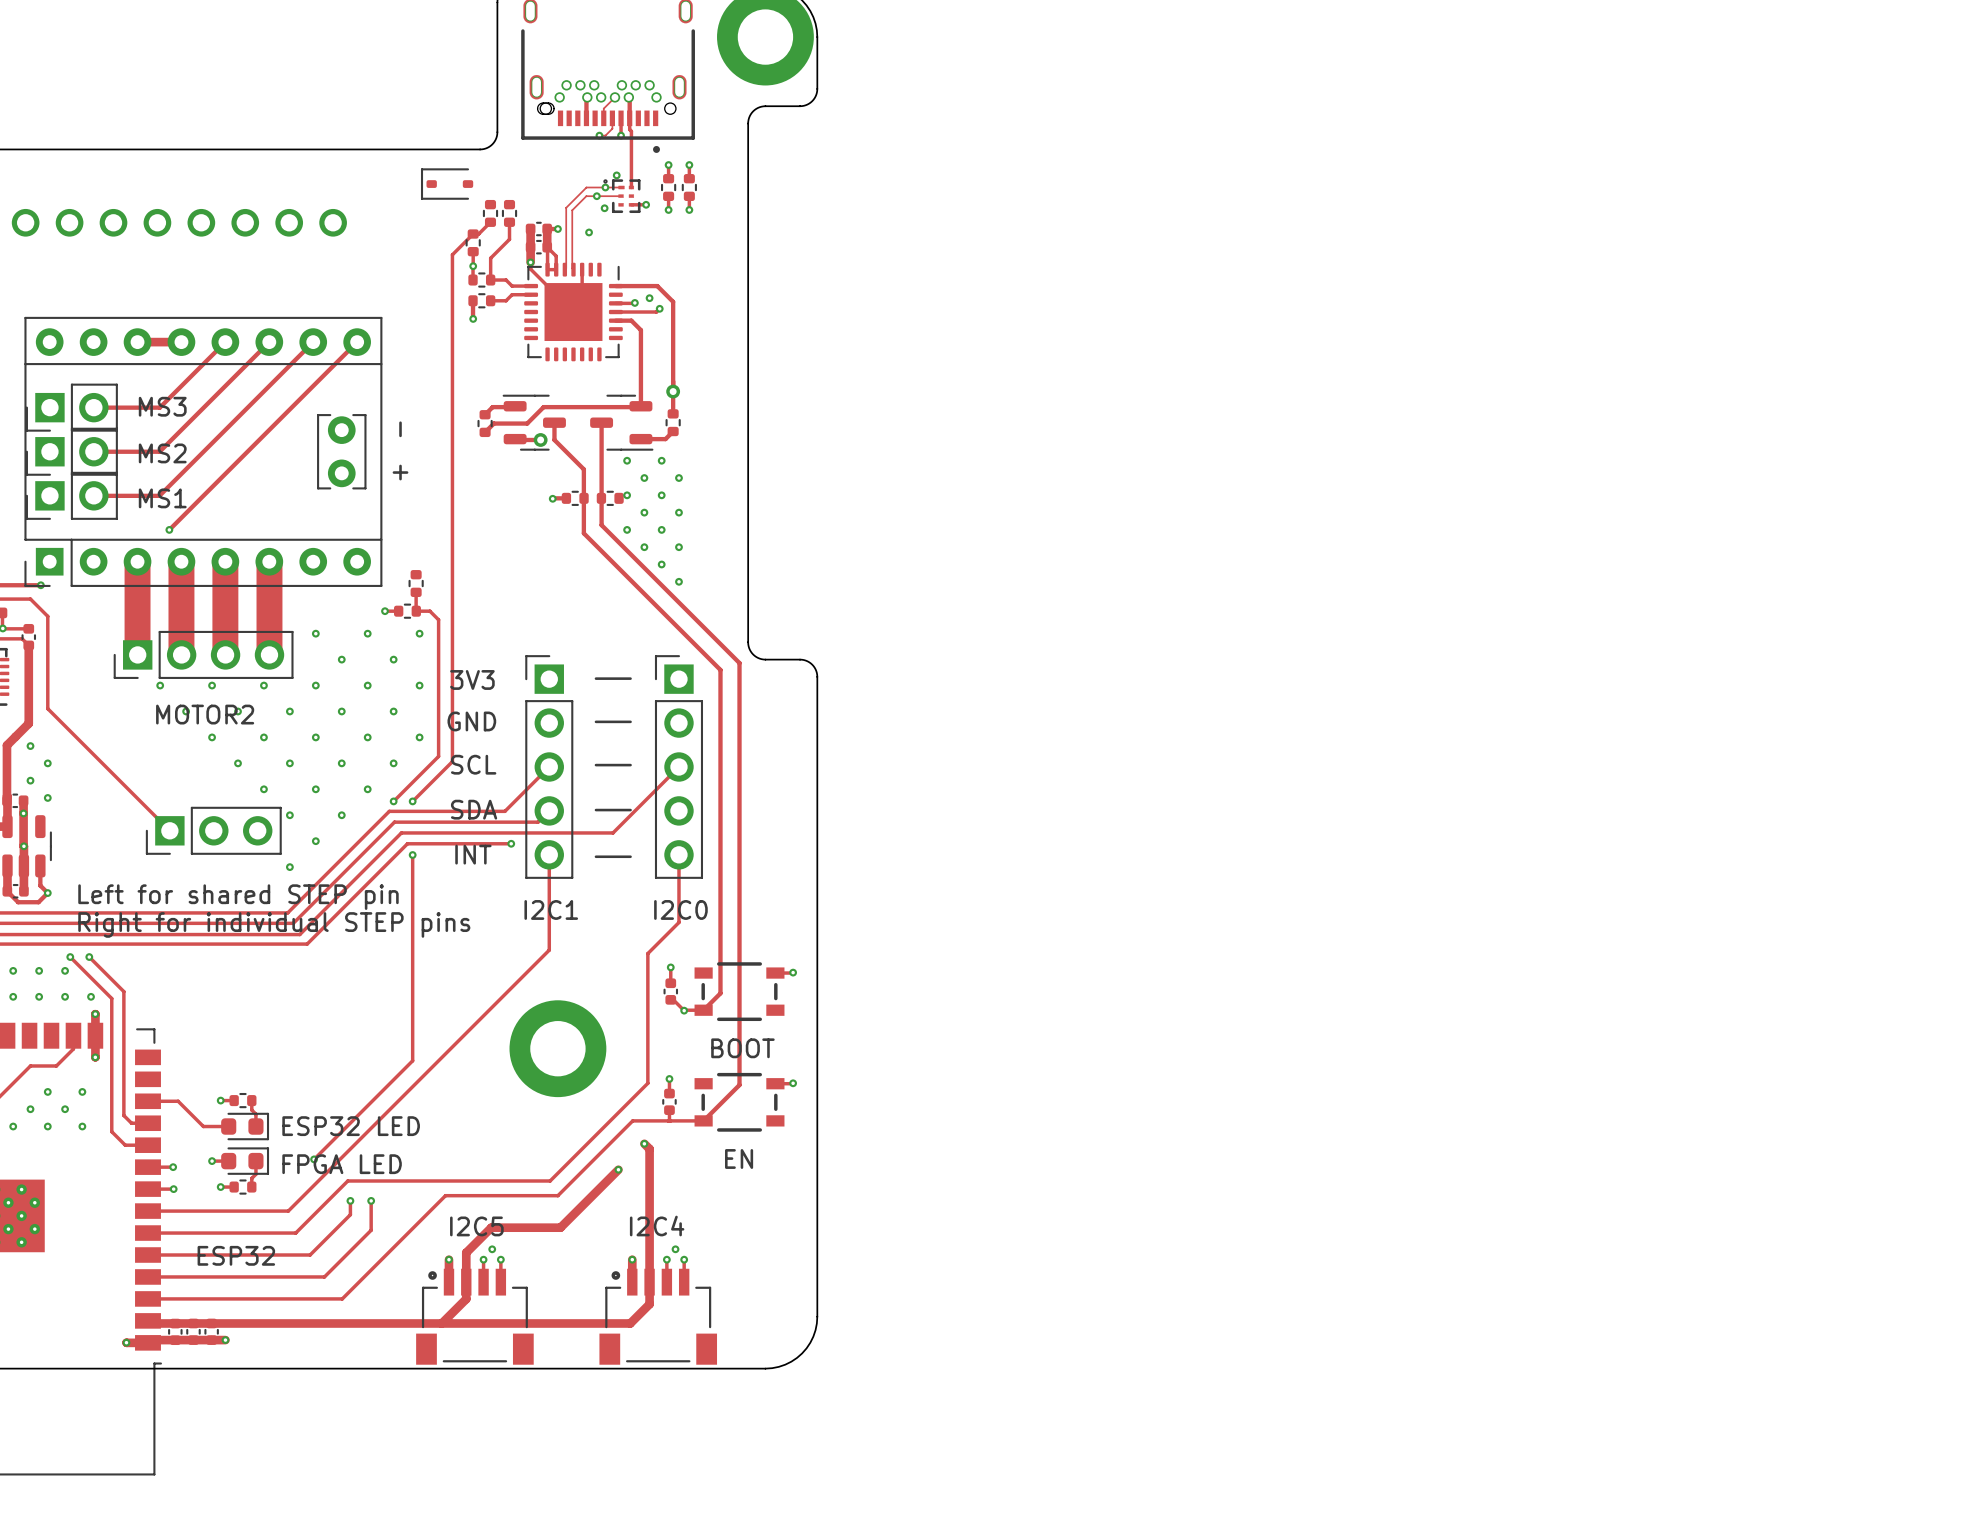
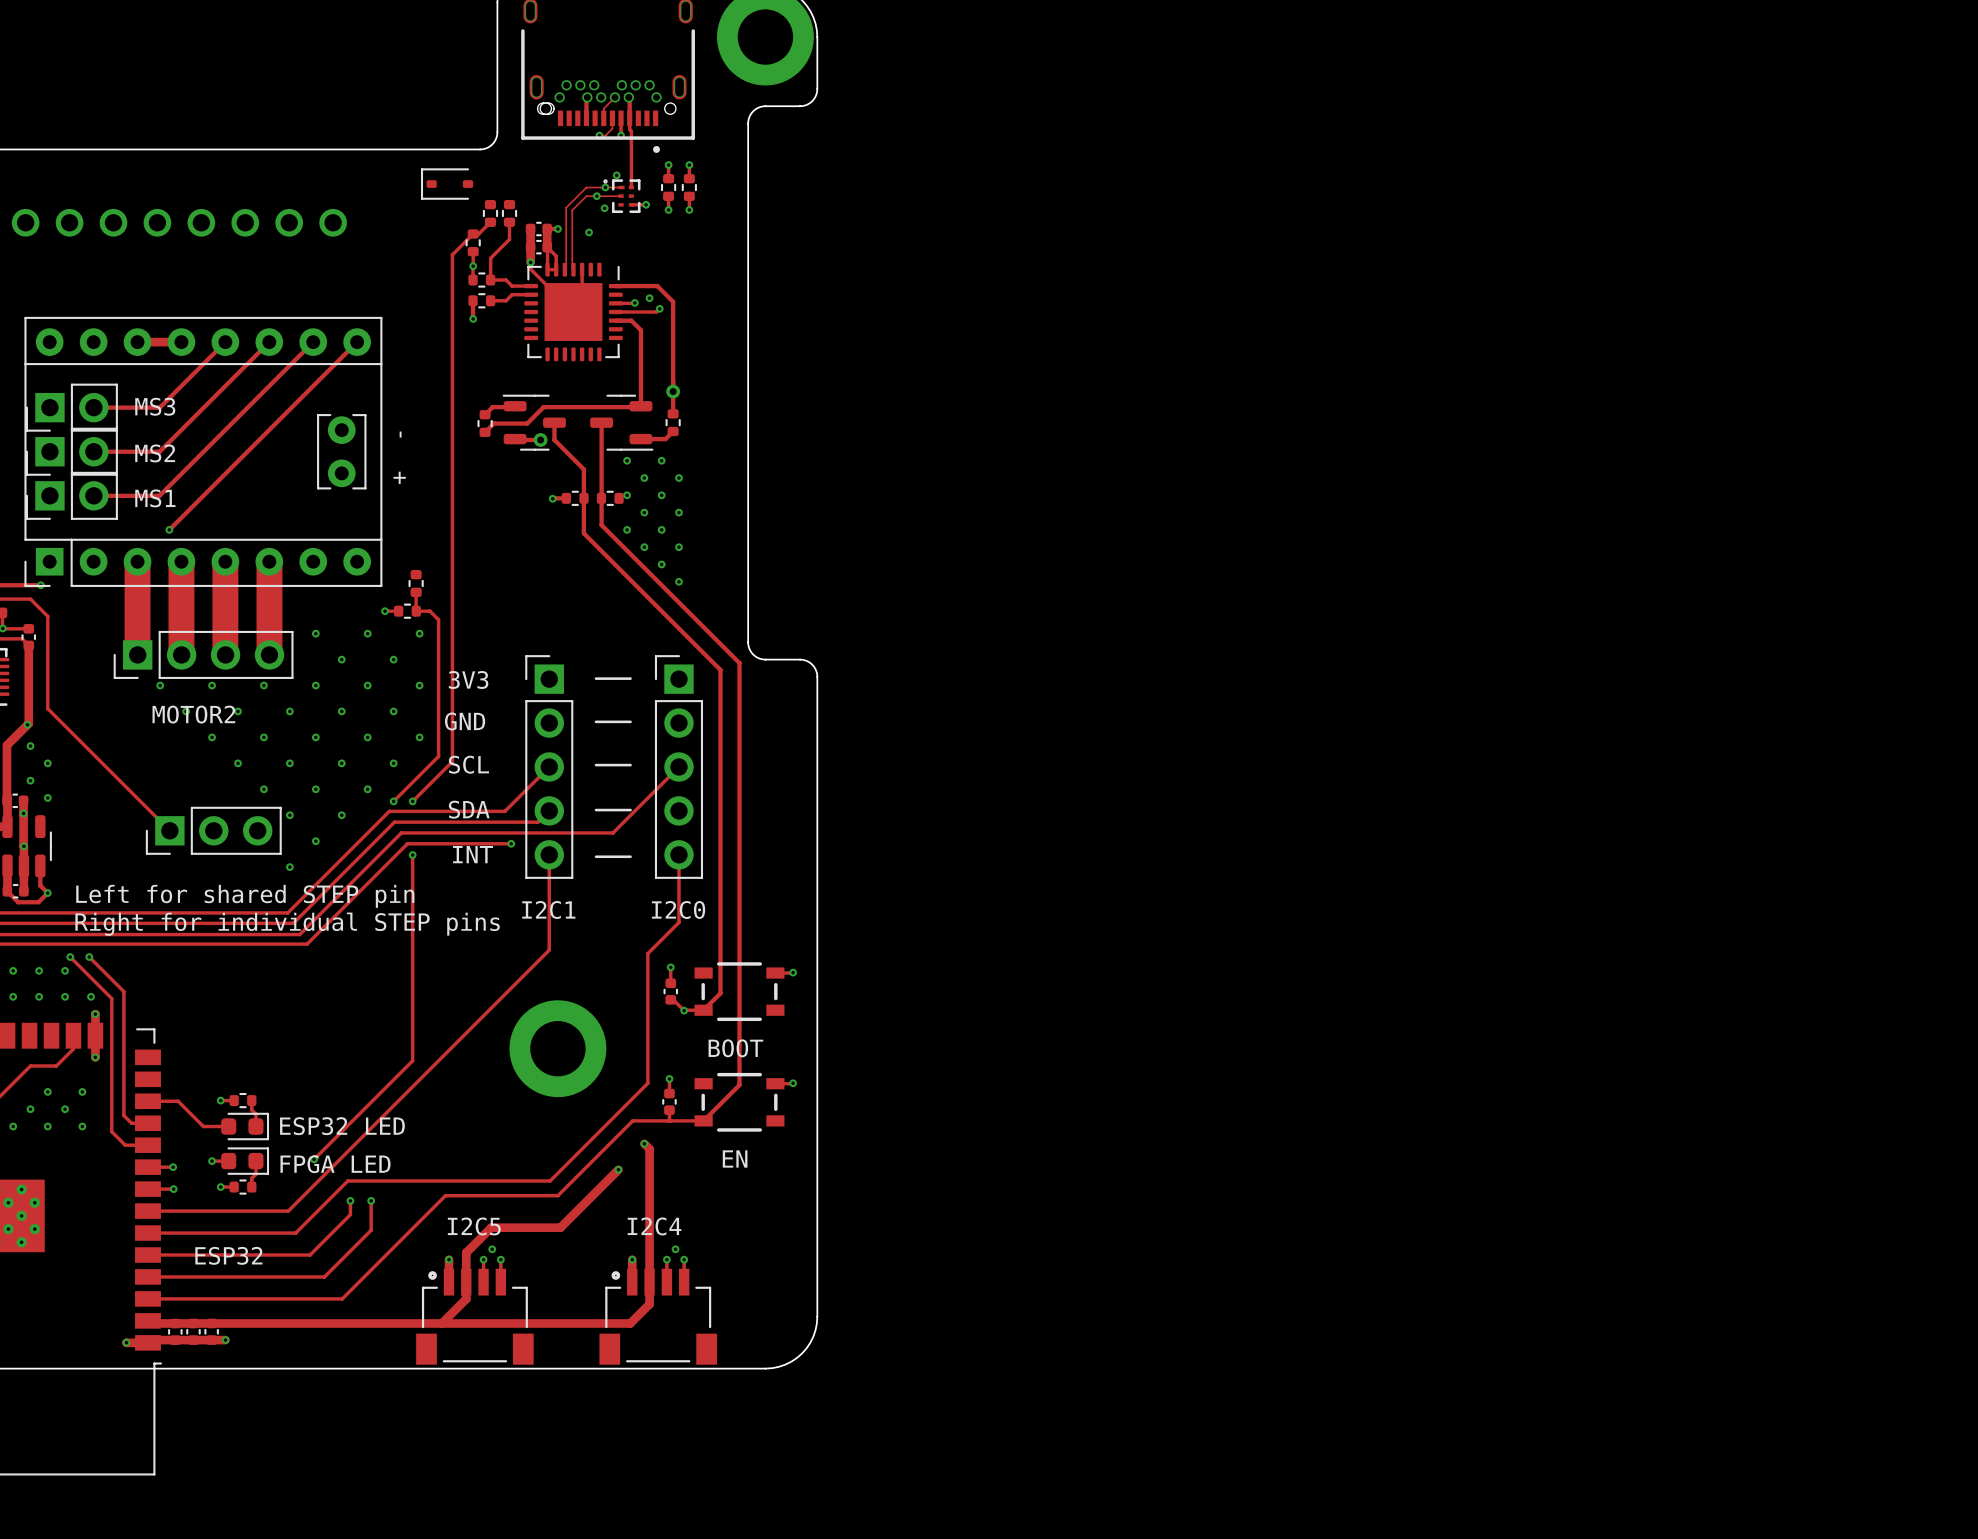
via: none -> (27, 724)

